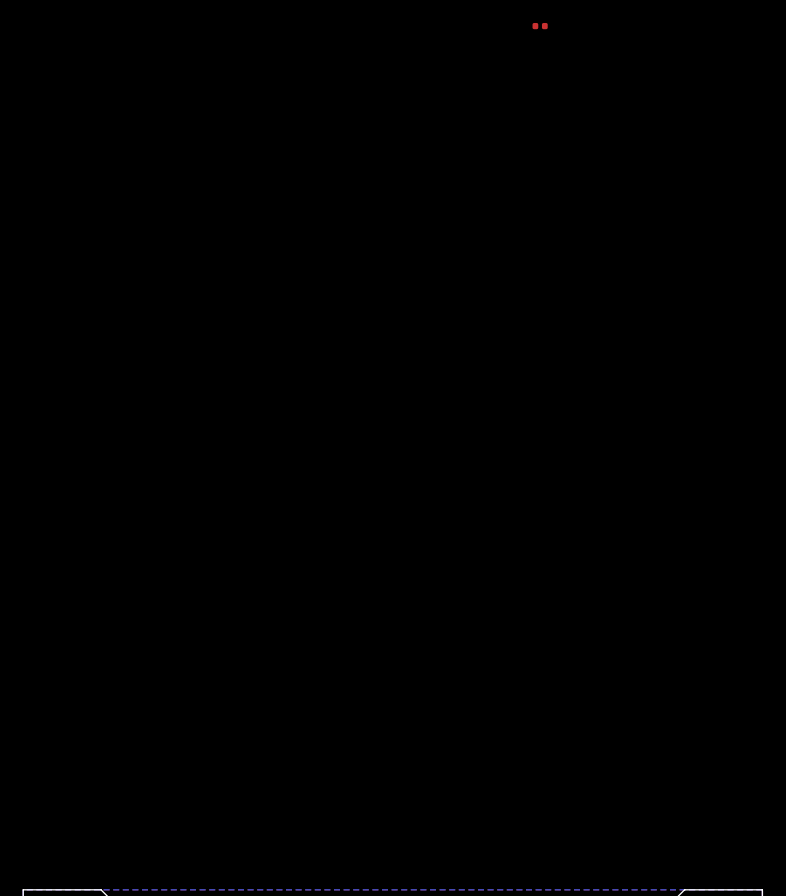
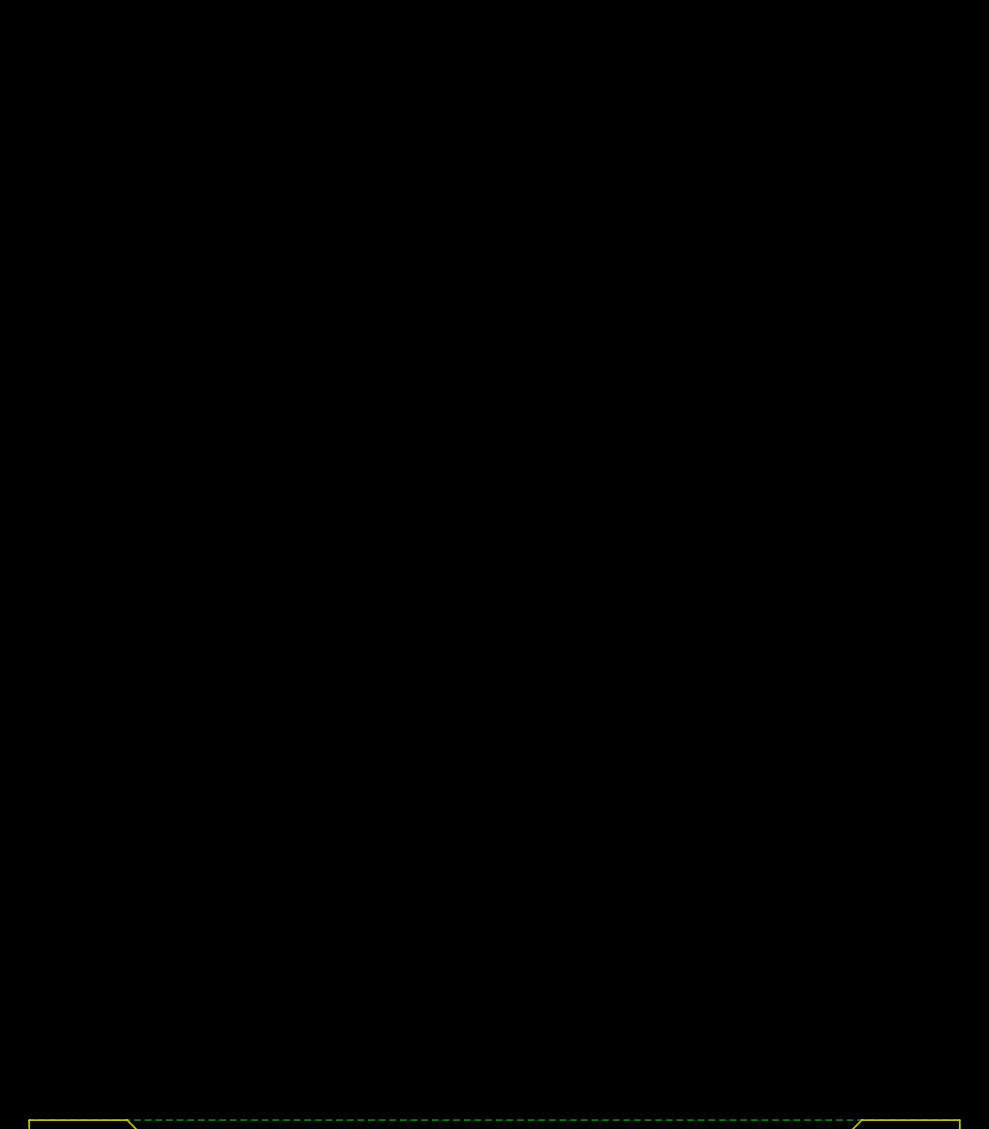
part: (540, 26) -> none

